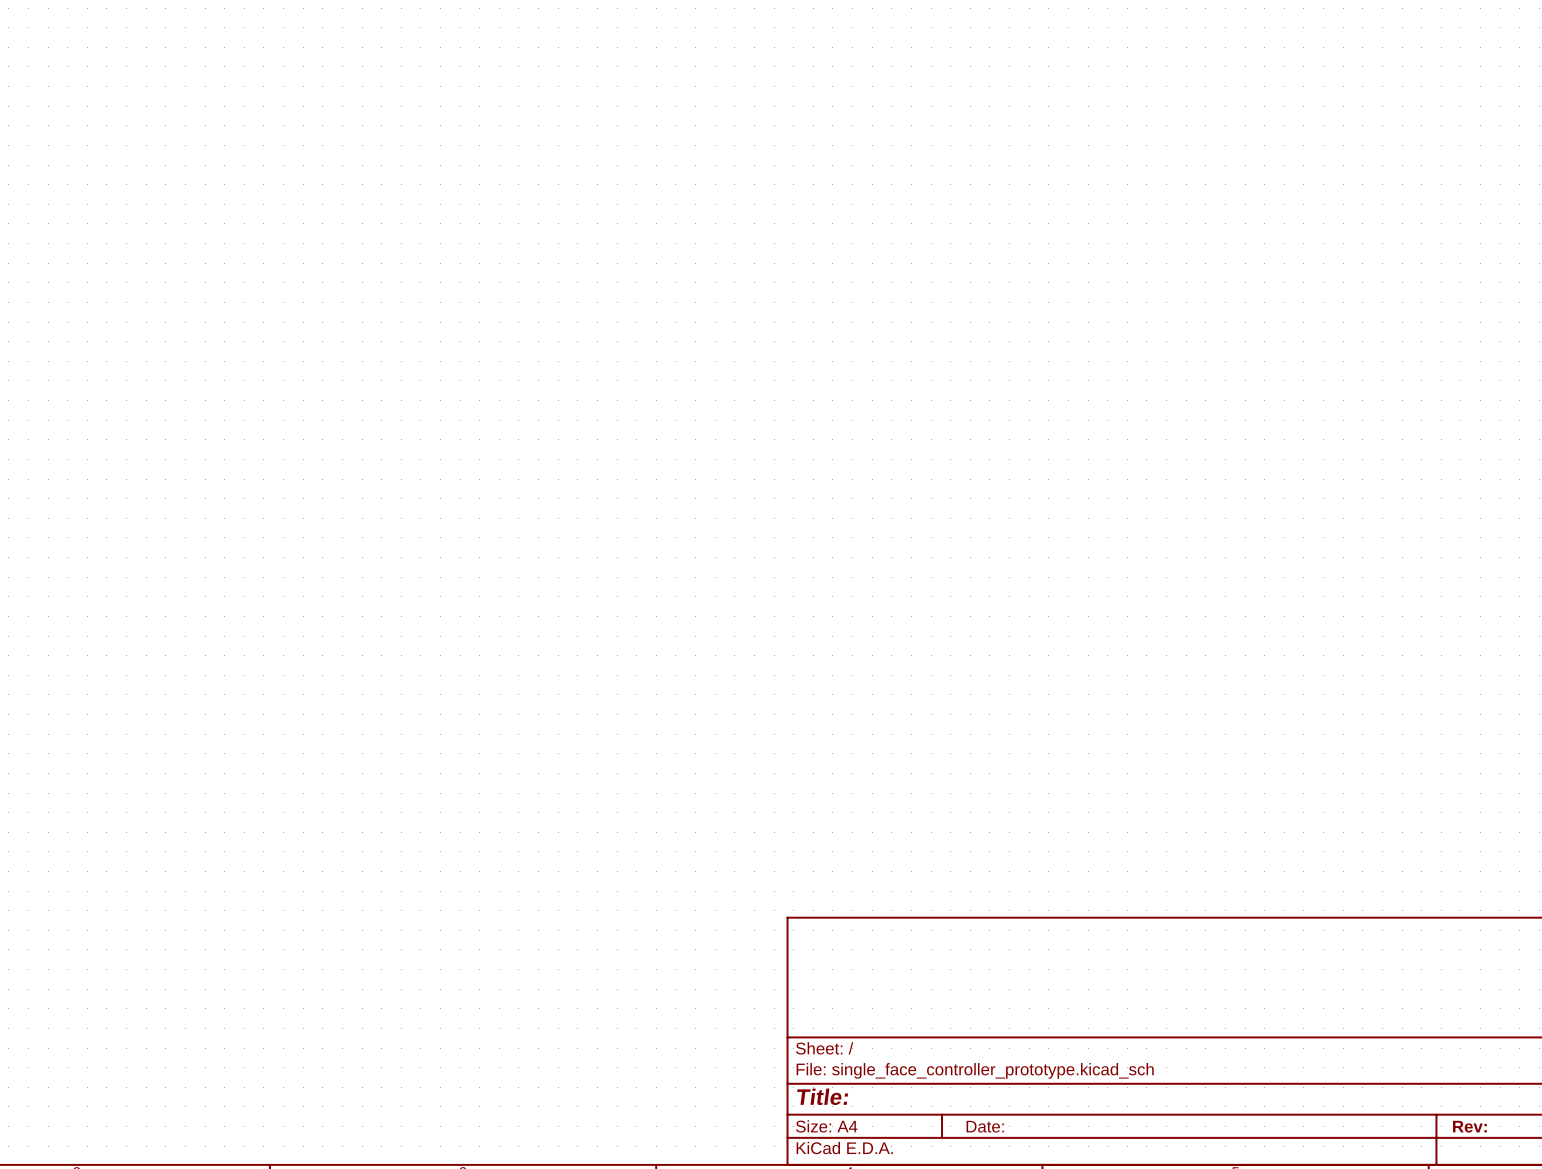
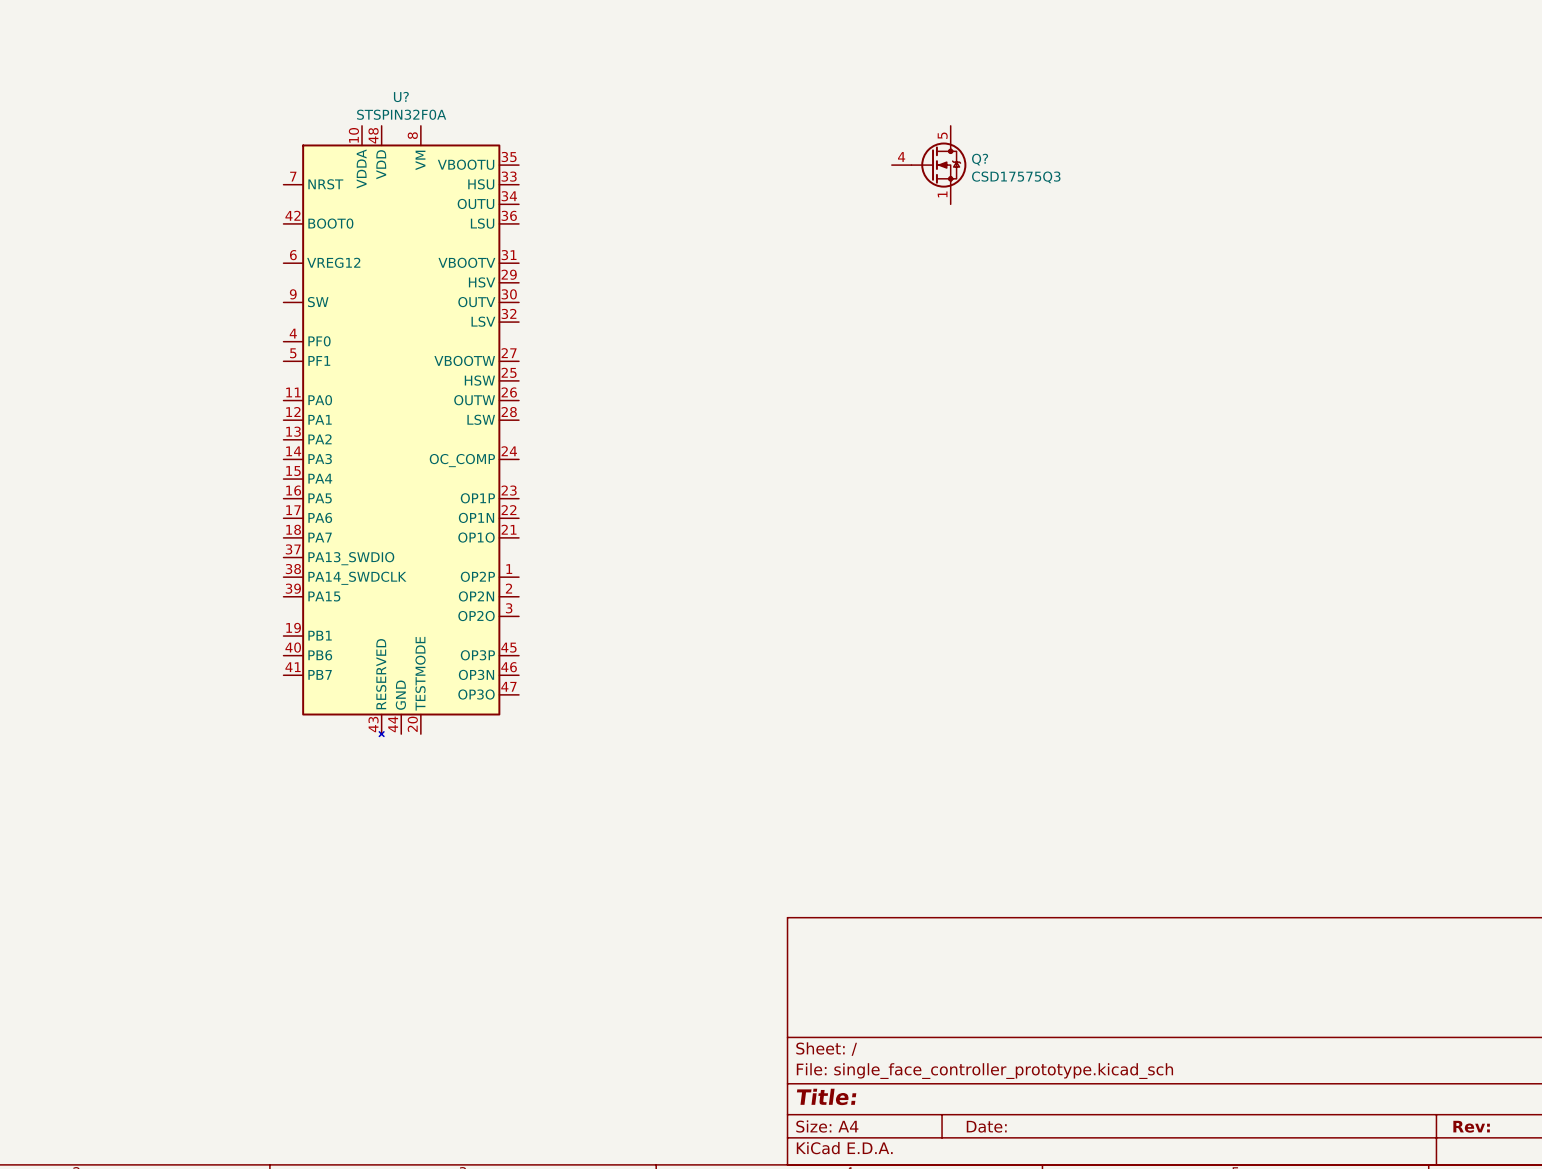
Q?: none -> CSD17575Q3 (929, 165)
U?: none -> STSPIN32F0A (401, 431)

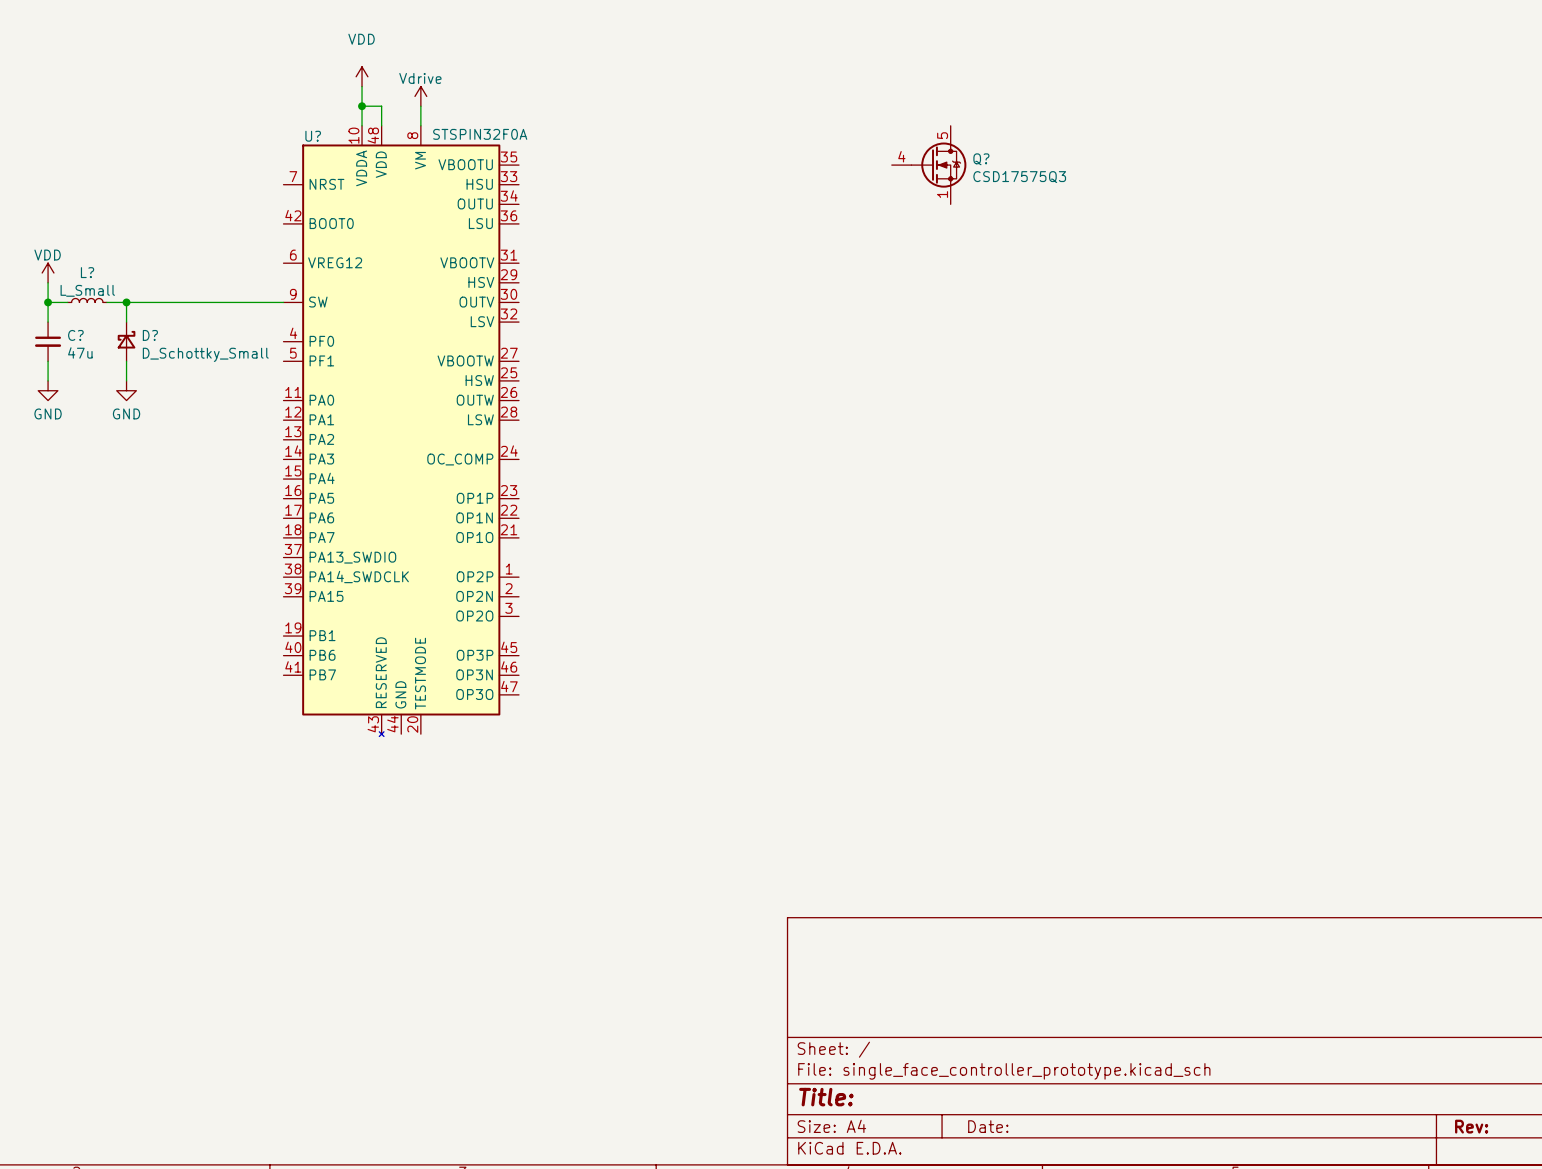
power symbol: none -> VDD (362, 76)
wire: none -> (362, 86) (362, 125)
U? name position: U? (401, 96) -> U? (313, 136)
power symbol: none -> Vdrive (420, 96)
wire: none -> (362, 106) (381, 106) (381, 125)
junction: none -> (362, 106)
wire: none -> (420, 106) (420, 125)
U? value position: STSPIN32F0A (401, 114) -> STSPIN32F0A (480, 134)
power symbol: none -> VDD (48, 273)
wire: none -> (48, 282) (48, 322)
L?: none -> L_Small (87, 300)
wire: none -> (48, 302) (67, 302)
junction: none -> (48, 302)
wire: none -> (106, 302) (283, 302)
wire: none -> (126, 302) (126, 322)
junction: none -> (126, 302)
C?: none -> 47u (48, 341)
D?: none -> D_Schottky_Small (126, 341)
wire: none -> (48, 361) (48, 380)
wire: none -> (126, 361) (126, 380)
power symbol: none -> GND (48, 390)
power symbol: none -> GND (126, 390)

